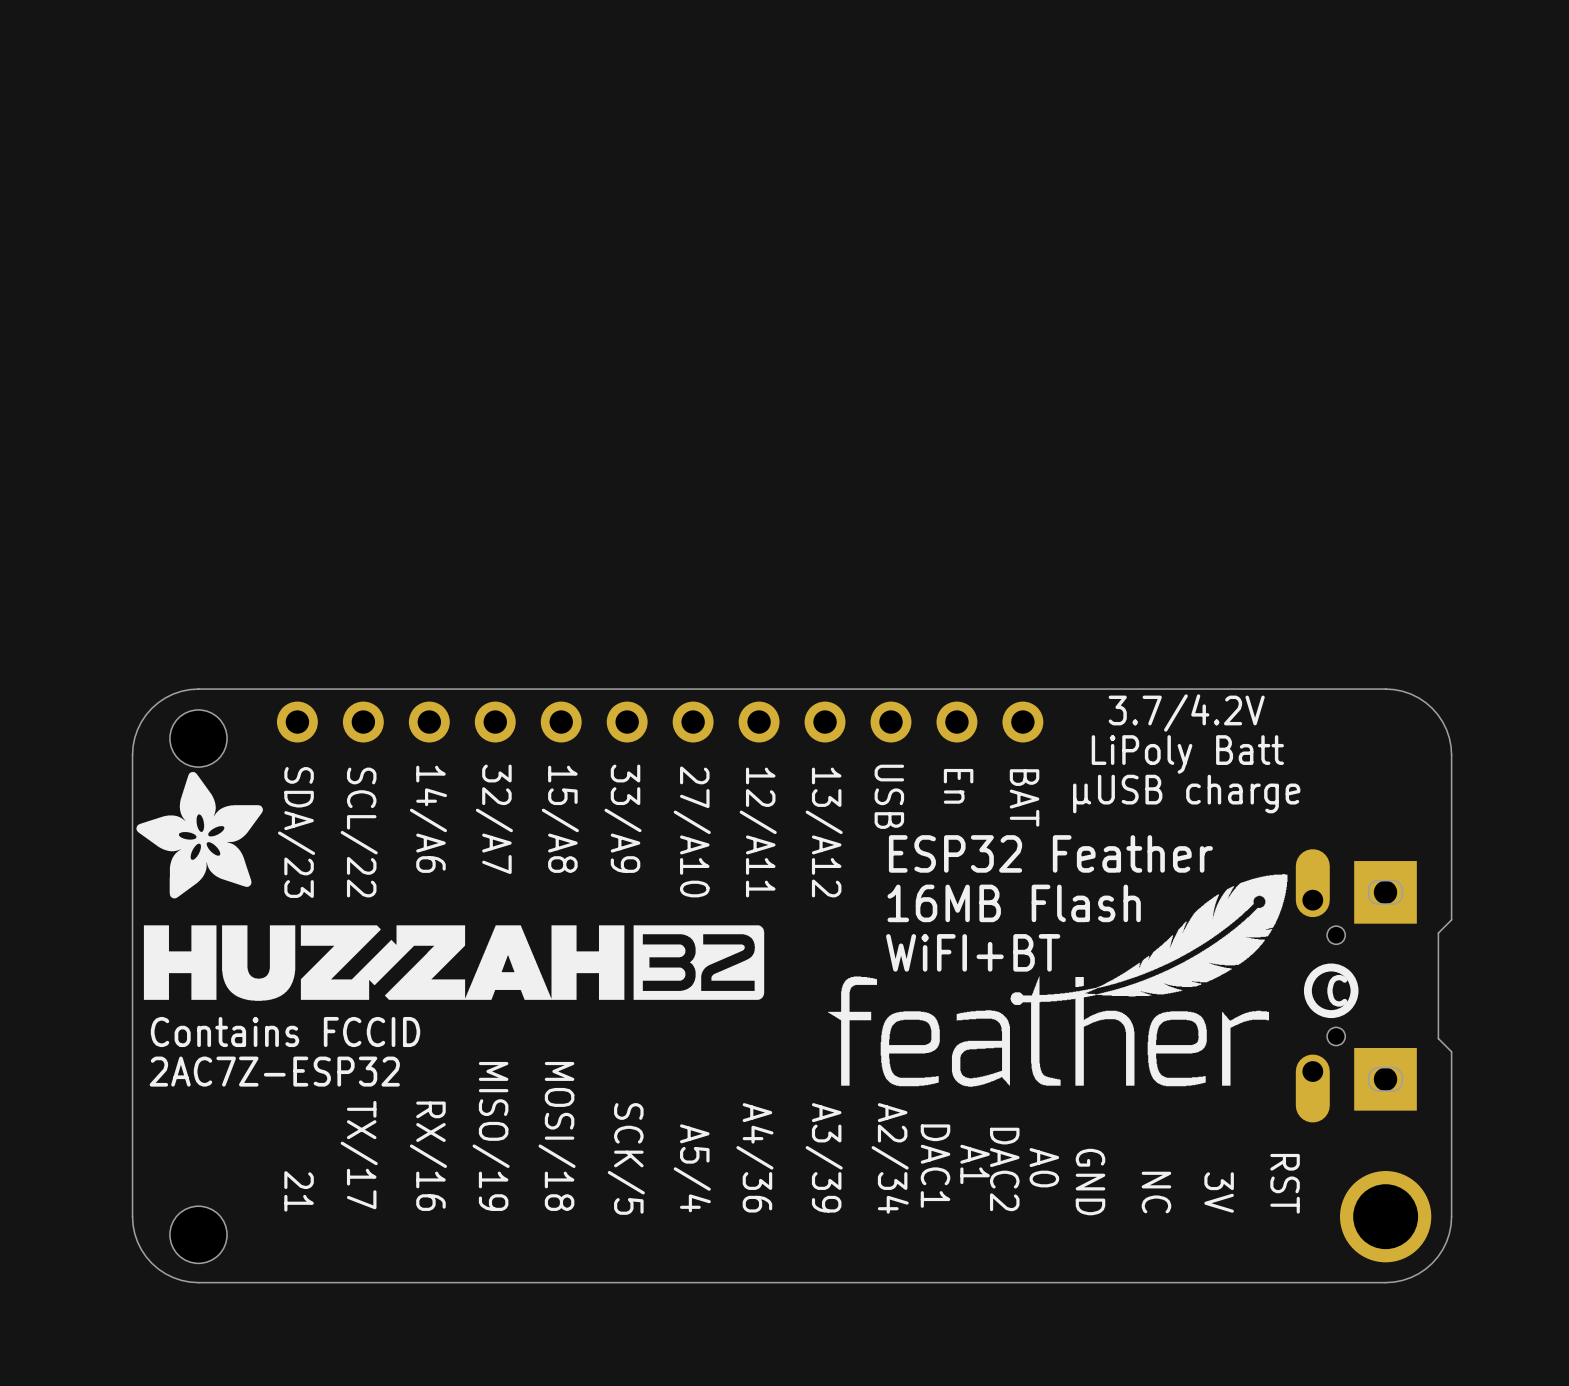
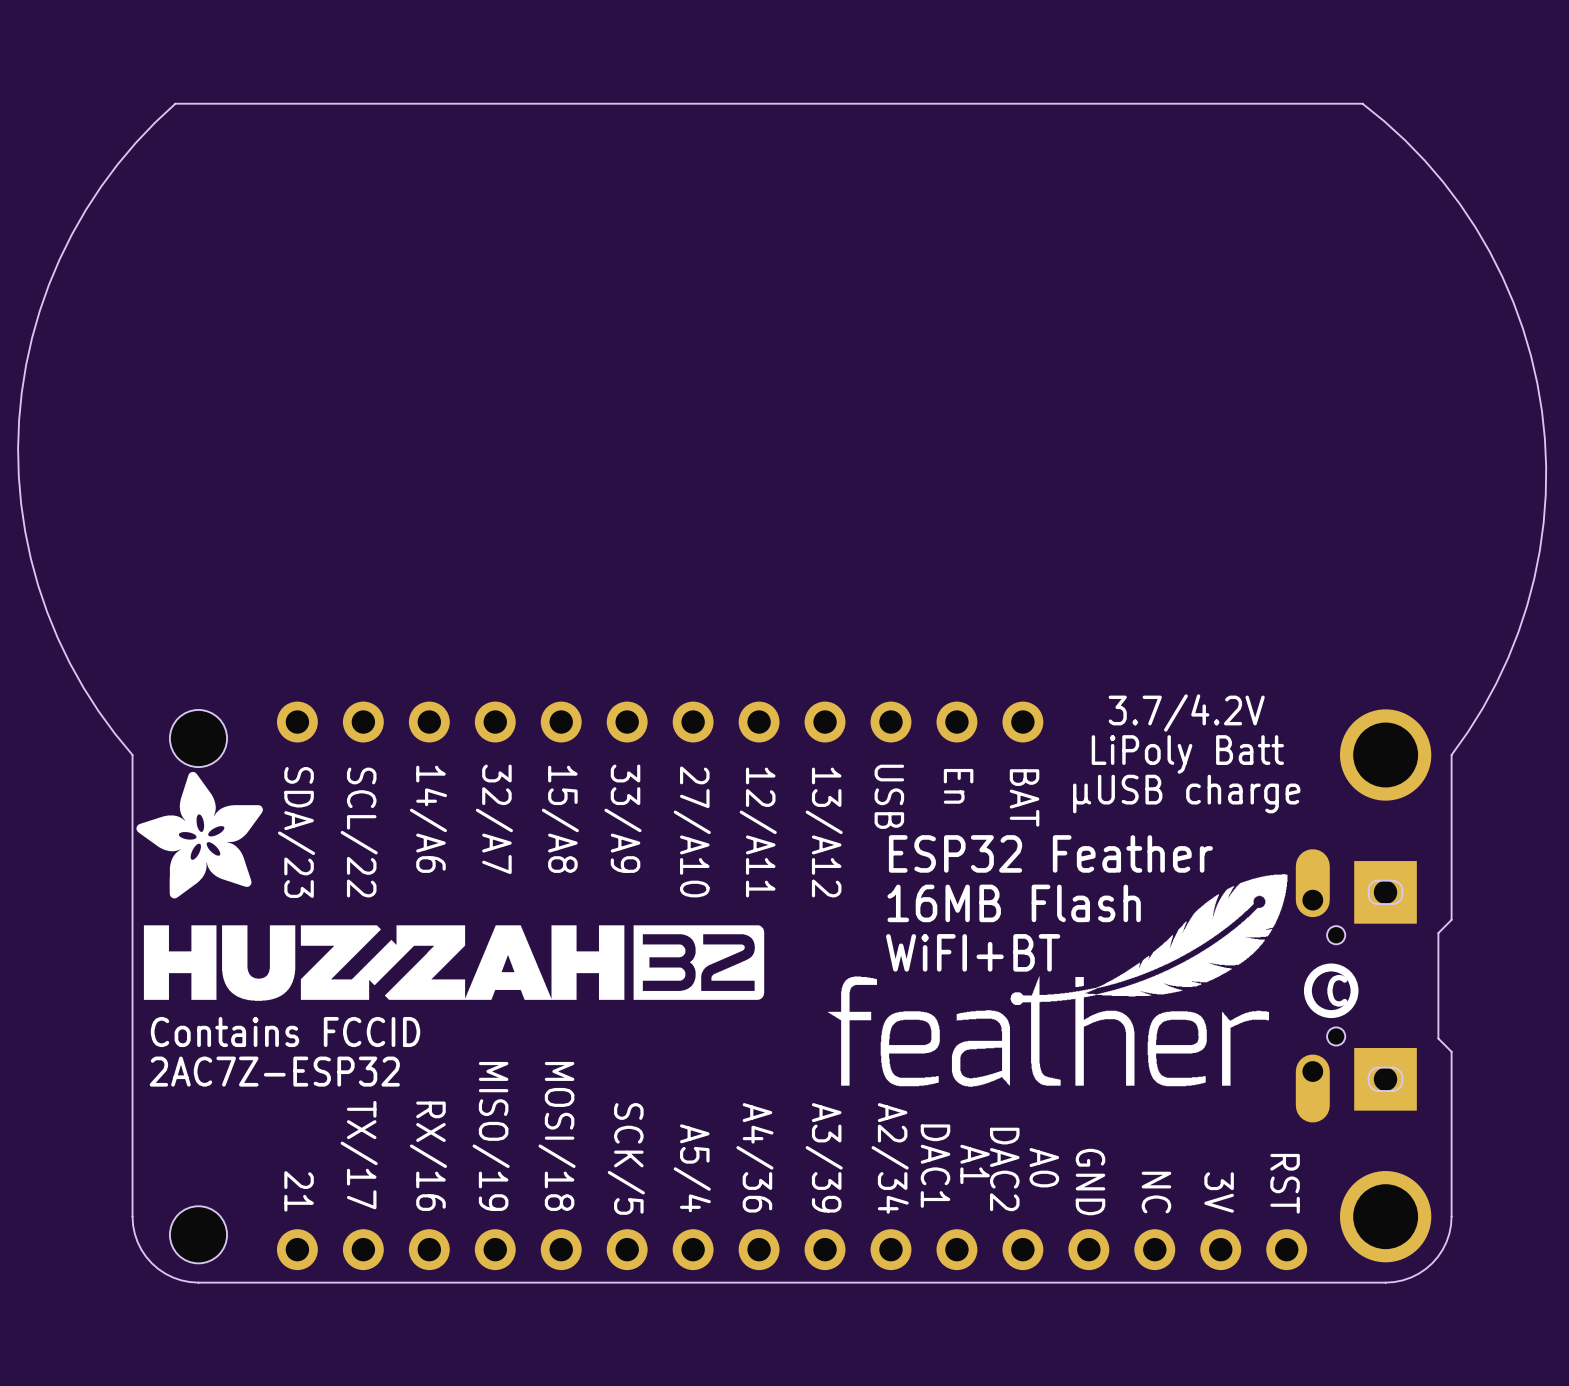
part: none -> (1385, 755)
board edge: (1451, 755) (1446, 729) (1432, 708) (1410, 694) (1385, 689) (198, 689) (173, 694) (151, 708) (137, 729) (132, 755) -> (1451, 755) (1482, 708) (1508, 658) (1527, 605) (1534, 578) (1539, 550) (1545, 494) (1546, 466) (1541, 410) (1531, 355) (1523, 328) (1502, 276) (1475, 227) (1459, 204) (1424, 160) (1384, 121) (1362, 103) (175, 103) (135, 142) (117, 164) (85, 209) (72, 234) (48, 284) (39, 311) (26, 365) (19, 420) (18, 476) (21, 503) (25, 531) (38, 585) (57, 637) (83, 687) (114, 733) (132, 755)
part: none -> (792, 1249)

